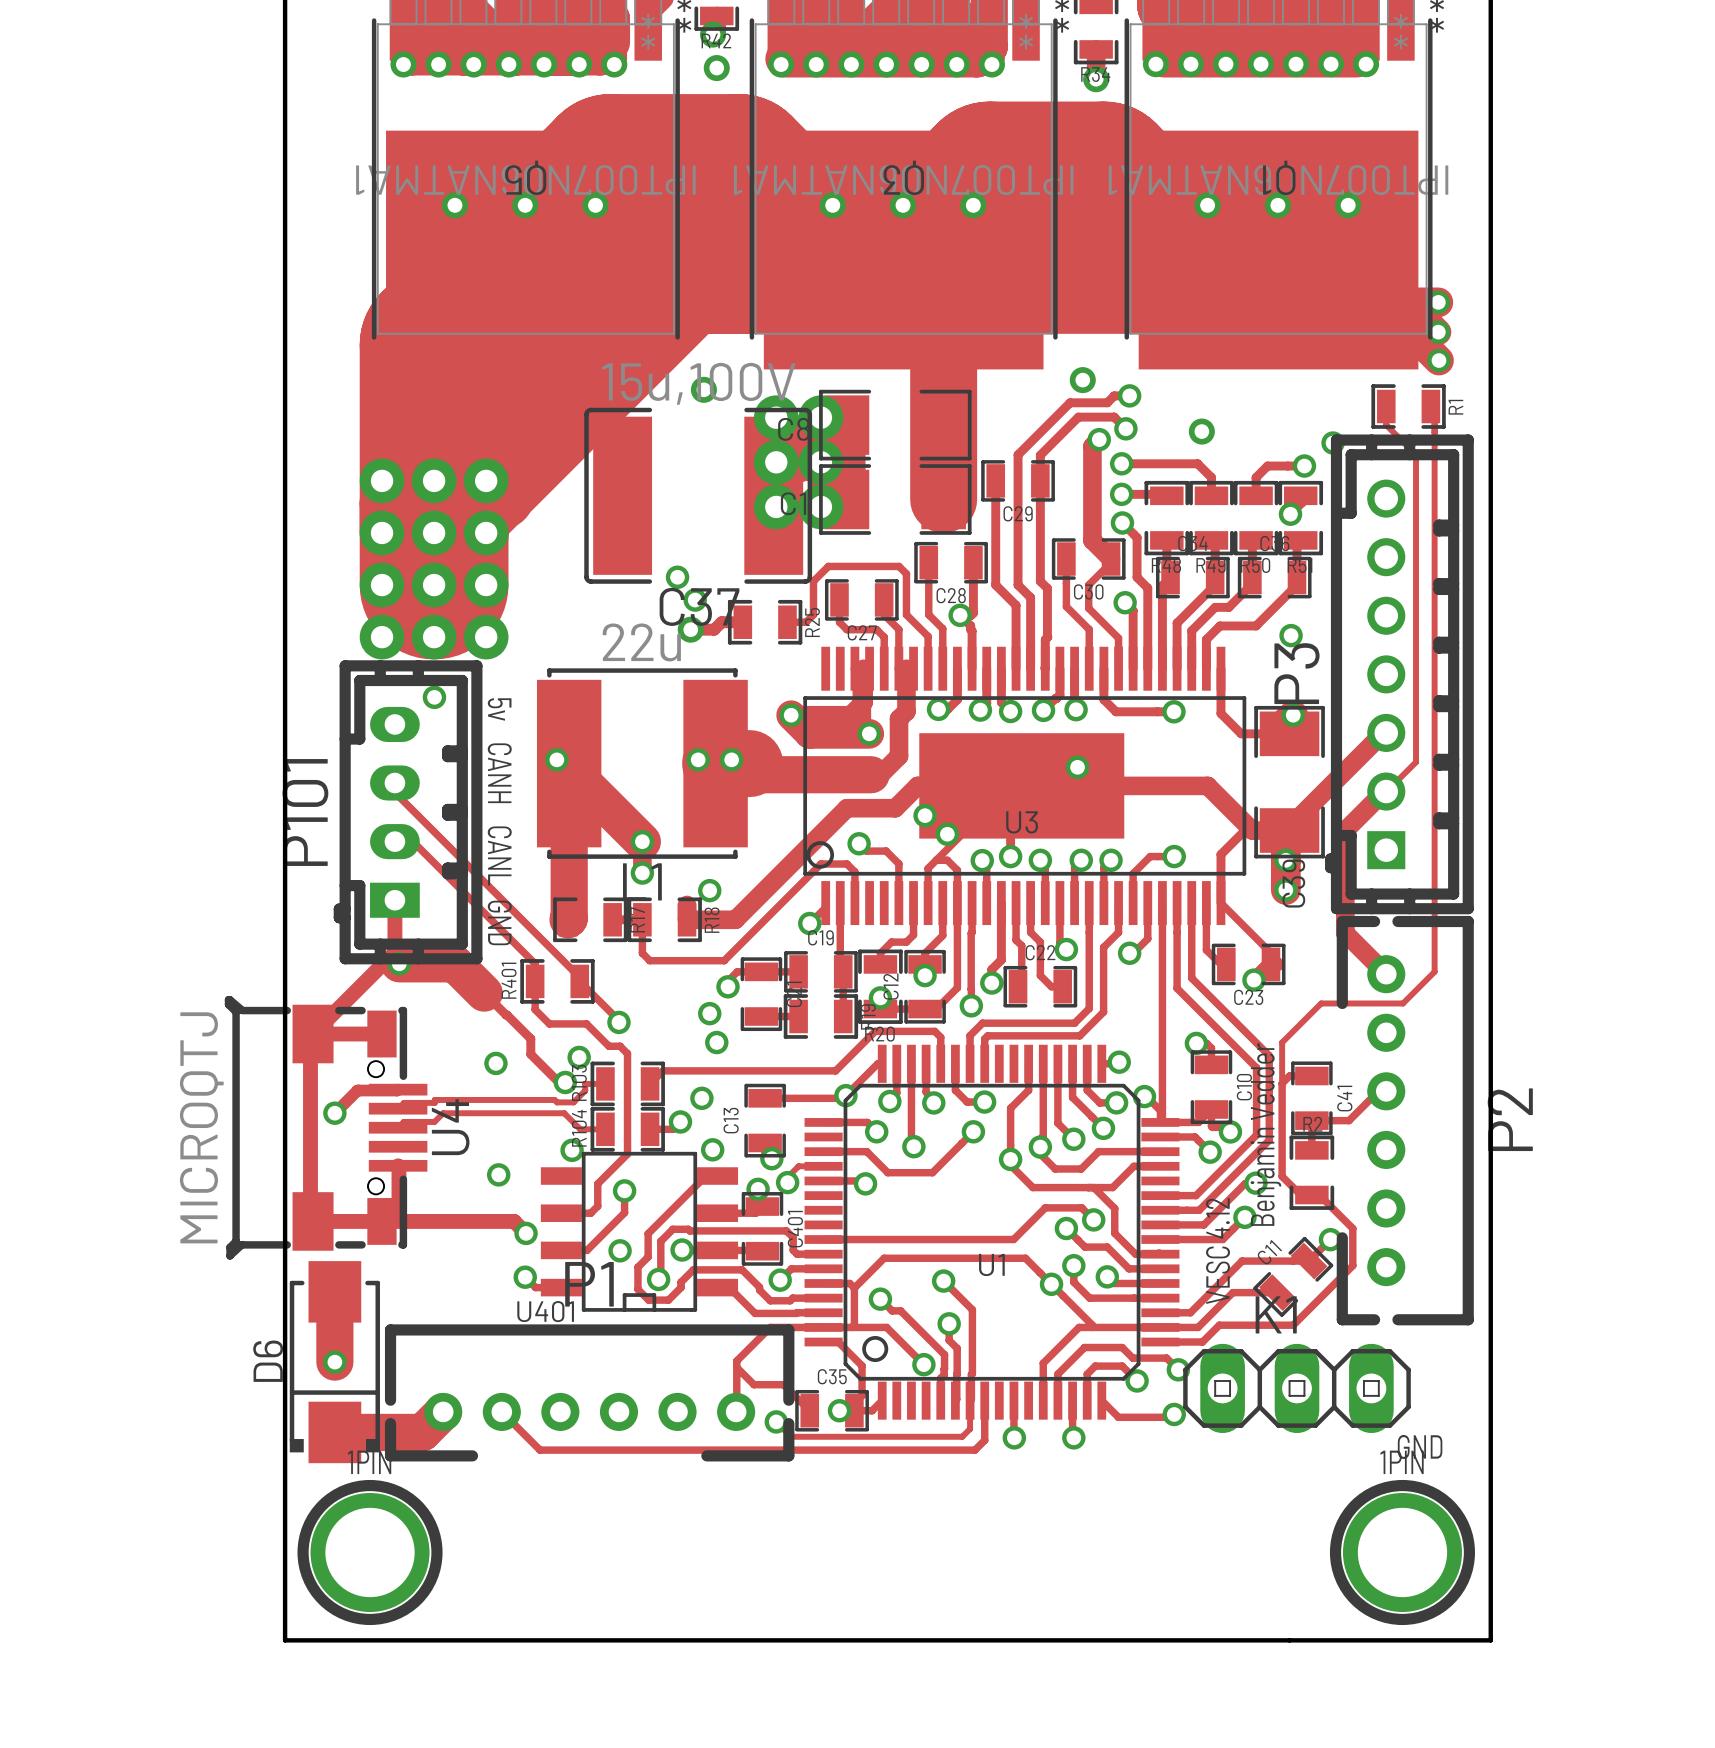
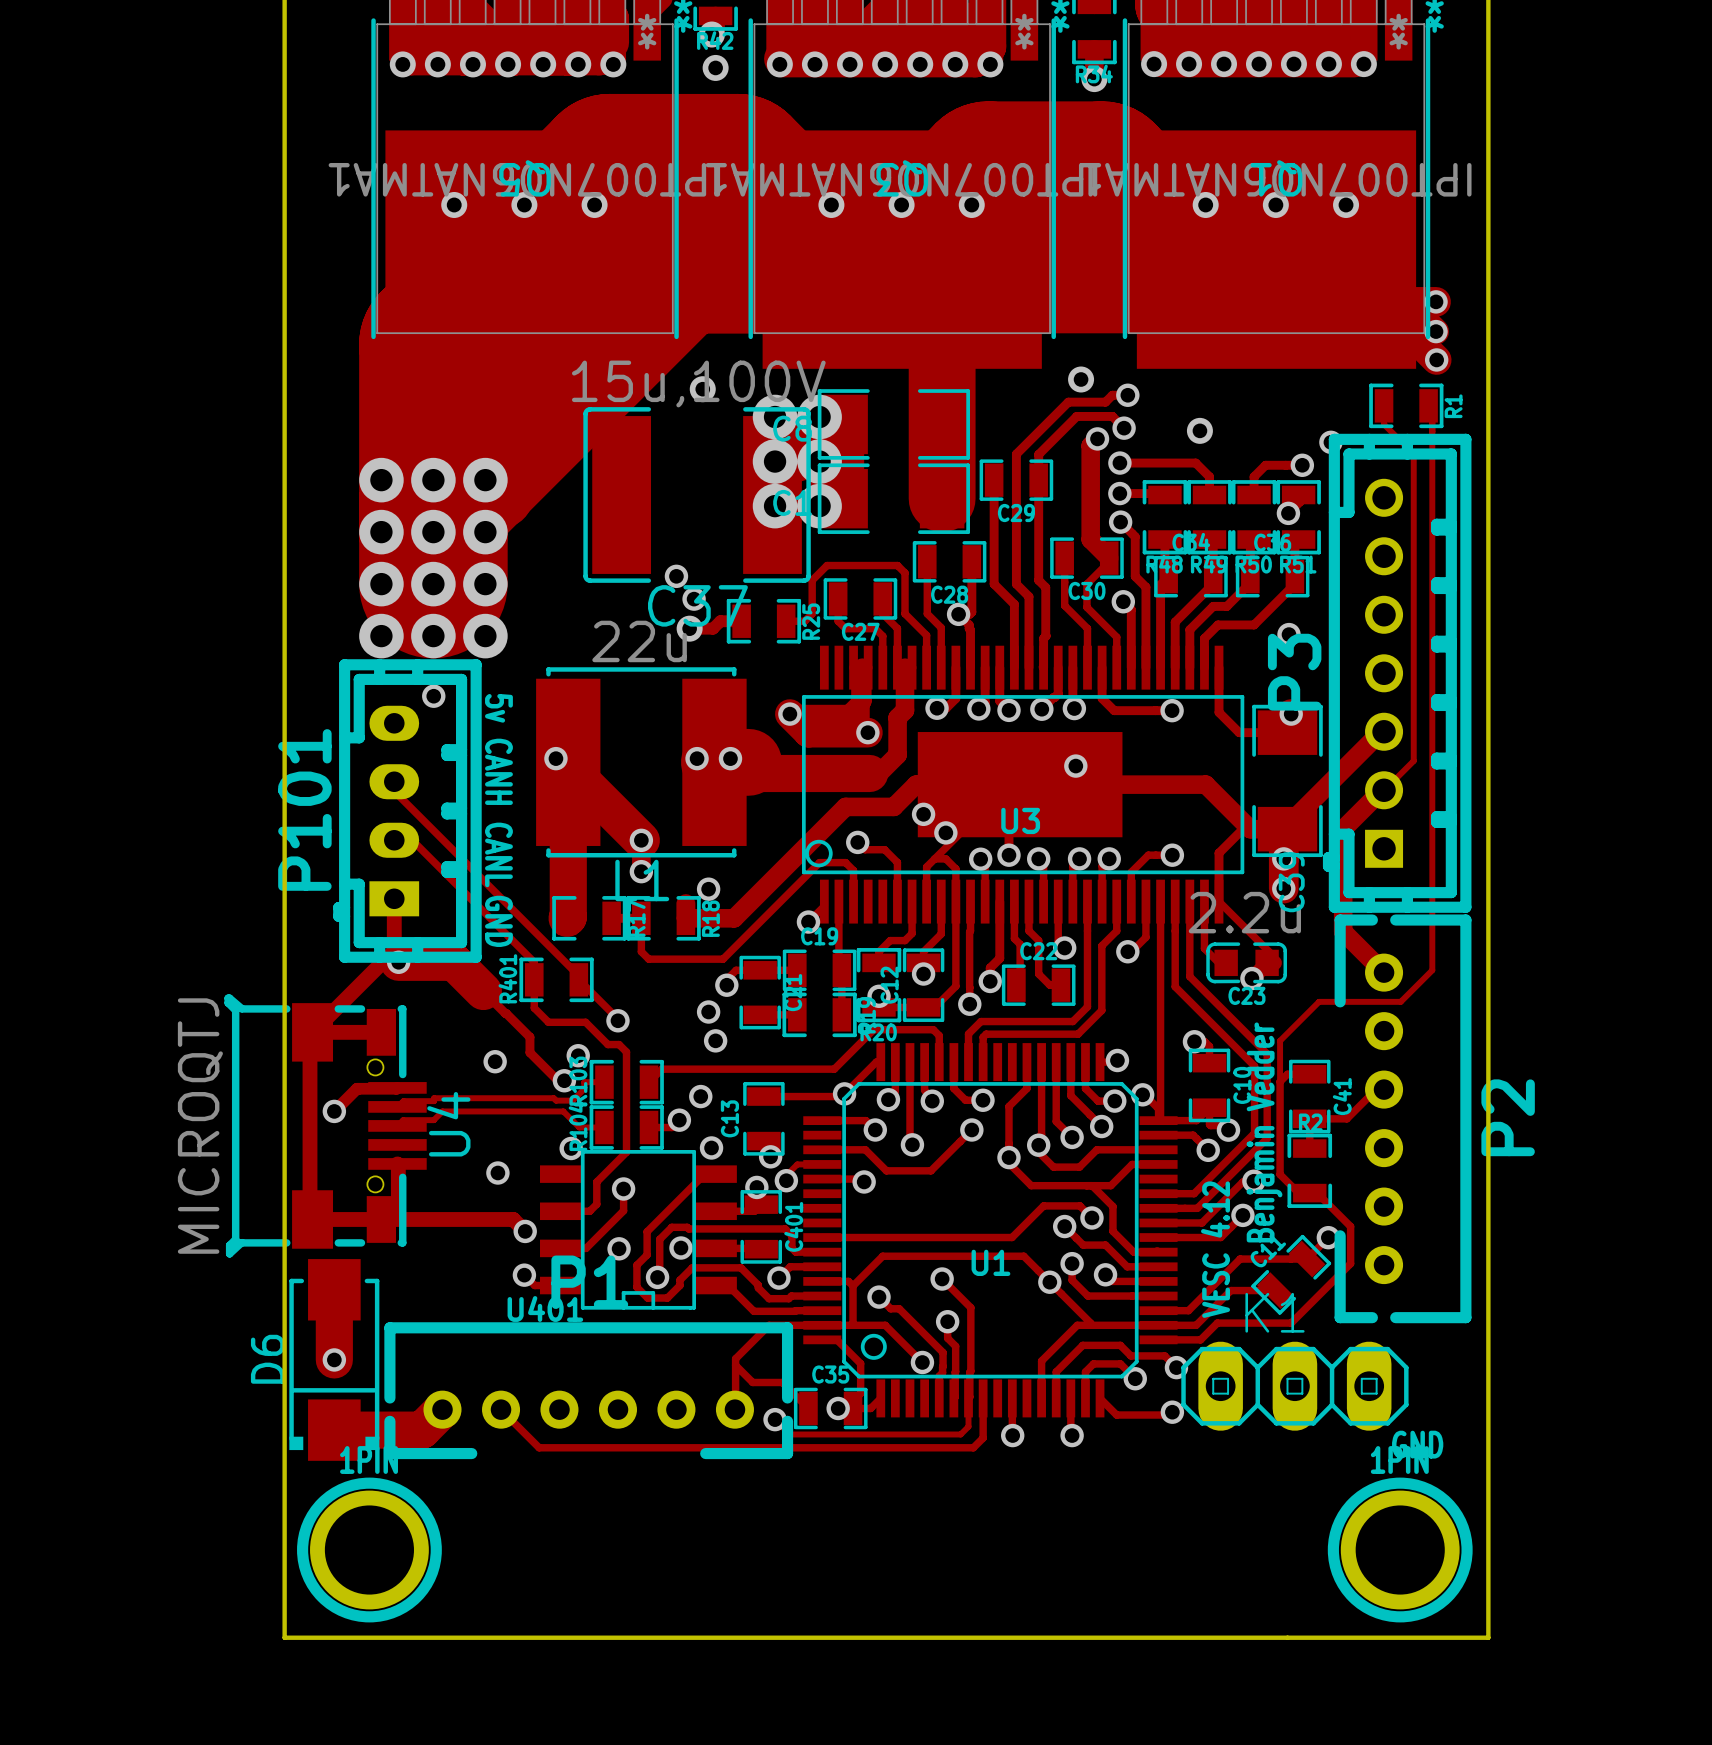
C23 value: none -> 2.2u (1244, 912)
C23 footprint: [1211, 943, 1286, 986] -> [1206, 942, 1288, 984]

